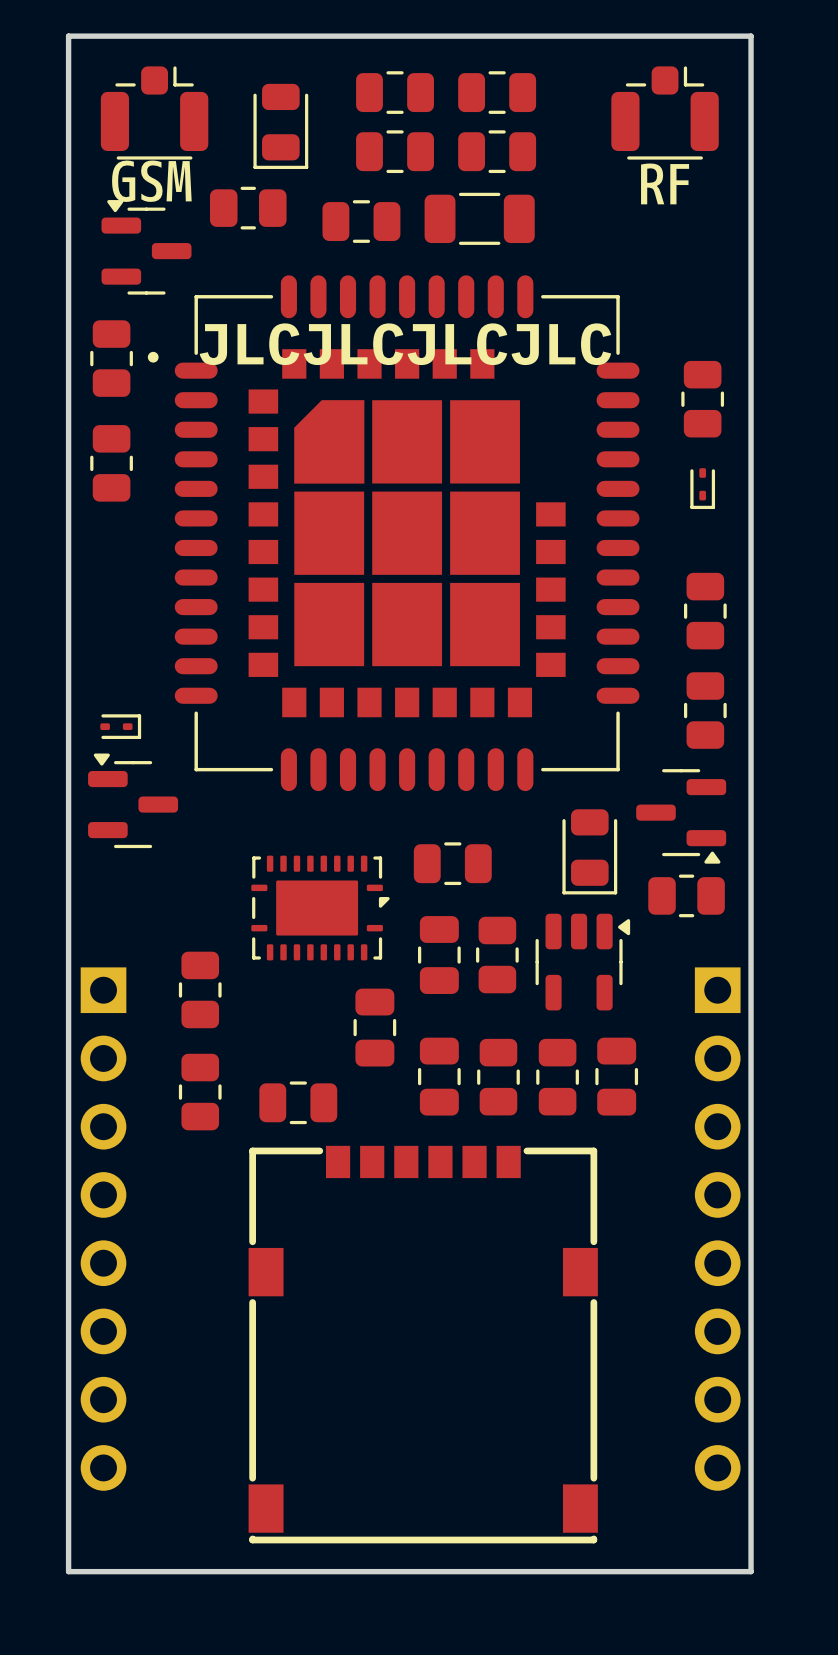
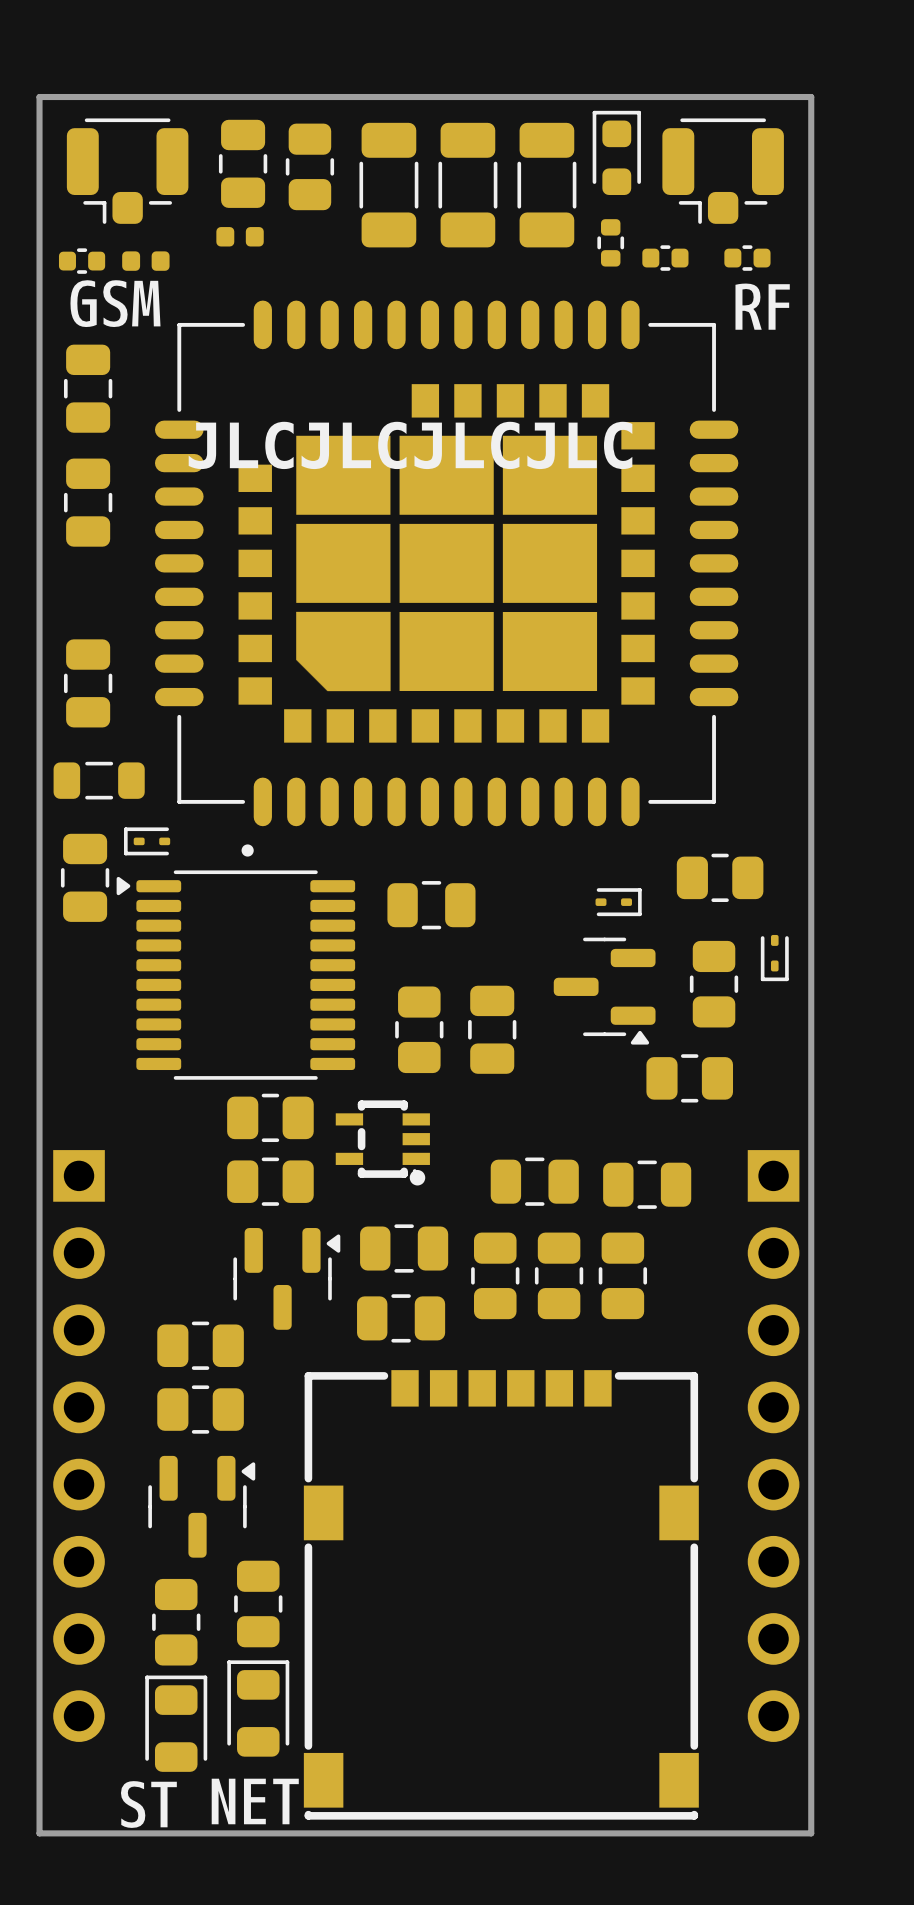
part: none -> (616, 152)
part: (395, 92) -> none
part: (497, 92) -> none
part: none -> (243, 163)
part rotation: 0° (154, 112) -> 180° (127, 171)
part rotation: 0° (665, 112) -> 180° (723, 171)
part: none -> (388, 185)
part: none -> (467, 185)
part: none -> (546, 185)
part: (280, 126) -> none
part: (395, 151) -> none
part: (497, 151) -> none
part: none -> (240, 236)
part: none -> (610, 242)
part: none -> (665, 258)
part: none -> (747, 258)
part: none -> (82, 261)
drawing position: (151, 181) -> (115, 303)
part: none -> (145, 261)
drawing position: (665, 183) -> (762, 306)
part rotation: 0° (248, 208) -> 90° clockwise (309, 166)
part position: (248, 208) -> (309, 166)
part: (479, 218) -> none
part: (361, 221) -> none
part: (146, 247) -> none
part: none -> (88, 388)
part: (111, 358) -> none
part: none -> (88, 502)
part: (702, 399) -> none
part: (111, 463) -> none
part: (702, 488) -> none
part rotation: 0° (393, 533) -> 90° counterclockwise (446, 578)
part: none -> (88, 683)
part: (705, 611) -> none
part: none -> (99, 780)
part: none -> (147, 841)
part rotation: 0° (705, 710) -> 90° clockwise (720, 877)
part footprint: [100, 714, 142, 740] -> [60, 833, 110, 922]
part: none -> (618, 902)
part: none -> (431, 905)
part footprint: [636, 769, 727, 864] -> [689, 940, 739, 1028]
part: none -> (774, 958)
part: (133, 800) -> none
part: none -> (235, 975)
part: none -> (604, 991)
part: (589, 851) -> none
part: none -> (419, 1029)
part rotation: 0° (452, 863) -> 90° clockwise (492, 1029)
part position: (686, 895) -> (689, 1078)
part: (320, 908) -> none
part: none -> (270, 1117)
part: (439, 955) -> none
part: (497, 955) -> none
part: none -> (382, 1142)
part: (582, 962) -> none
part: (200, 989) -> none
part: none -> (270, 1181)
part: none -> (534, 1181)
part: none -> (647, 1184)
part: (374, 1027) -> none
part: none -> (404, 1248)
part: (439, 1076) -> none
part: (616, 1076) -> none
part: (498, 1077) -> none
part: (557, 1077) -> none
part: none -> (495, 1275)
part: none -> (559, 1275)
part: none -> (622, 1275)
part footprint: [259, 1081, 338, 1125] -> [233, 1228, 341, 1330]
part rotation: 0° (200, 1092) -> 90° clockwise (200, 1345)
part position: (200, 1092) -> (200, 1345)
part: none -> (401, 1318)
part: none -> (200, 1409)
part: none -> (201, 1506)
part position: (423, 1344) -> (501, 1594)
part: none -> (258, 1604)
part: none -> (176, 1622)
part: none -> (258, 1708)
part: none -> (176, 1723)
drawing: none -> [120, 1778, 299, 1828]

